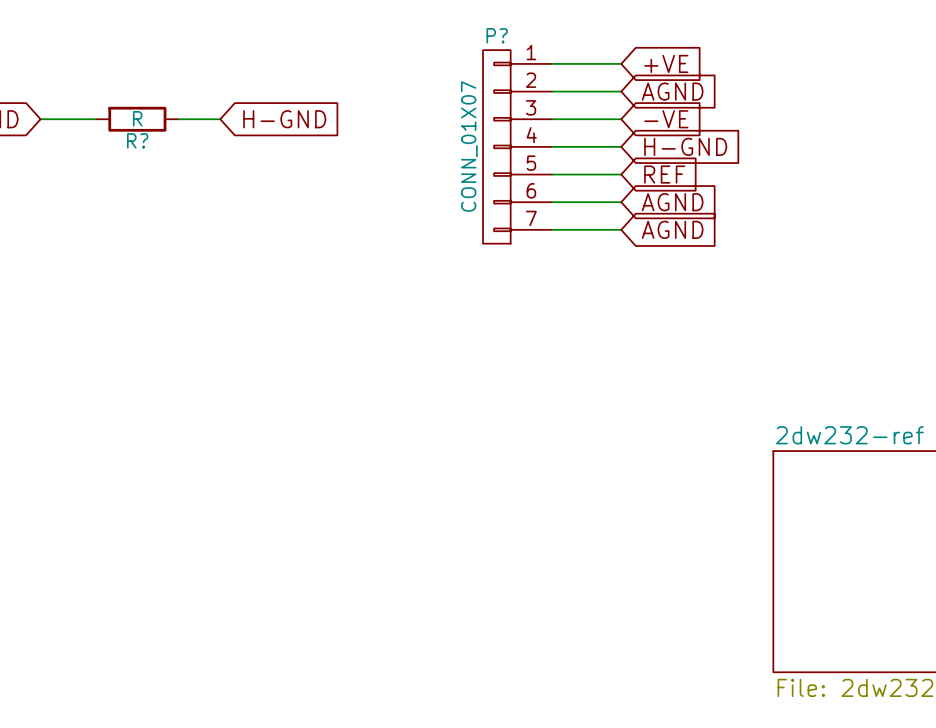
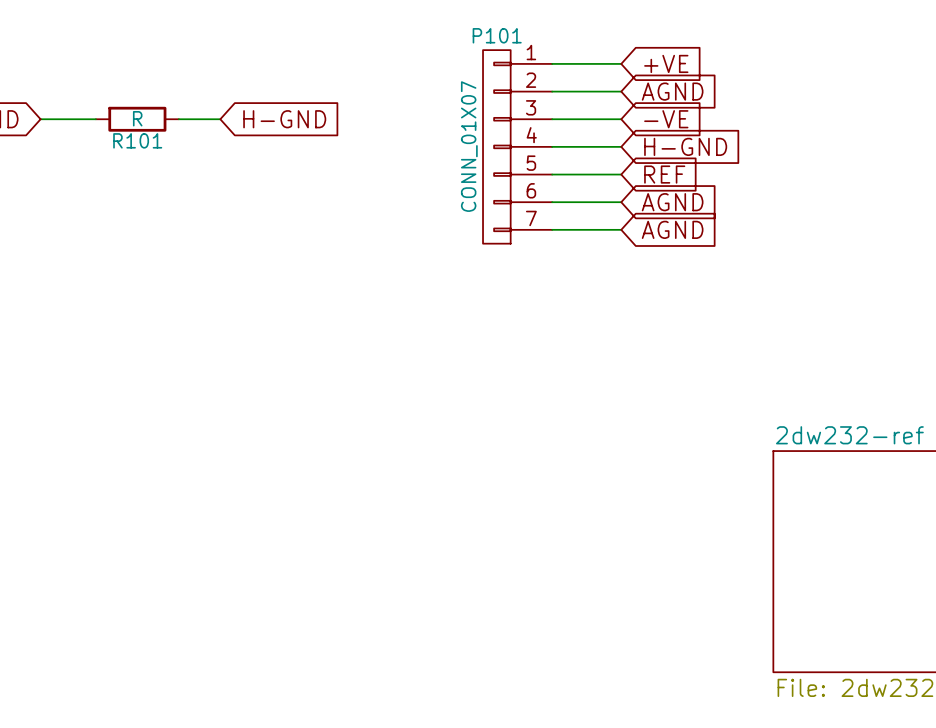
P? name: P? (497, 35) -> P101 (497, 35)
R? name: R? (137, 140) -> R101 (137, 140)

